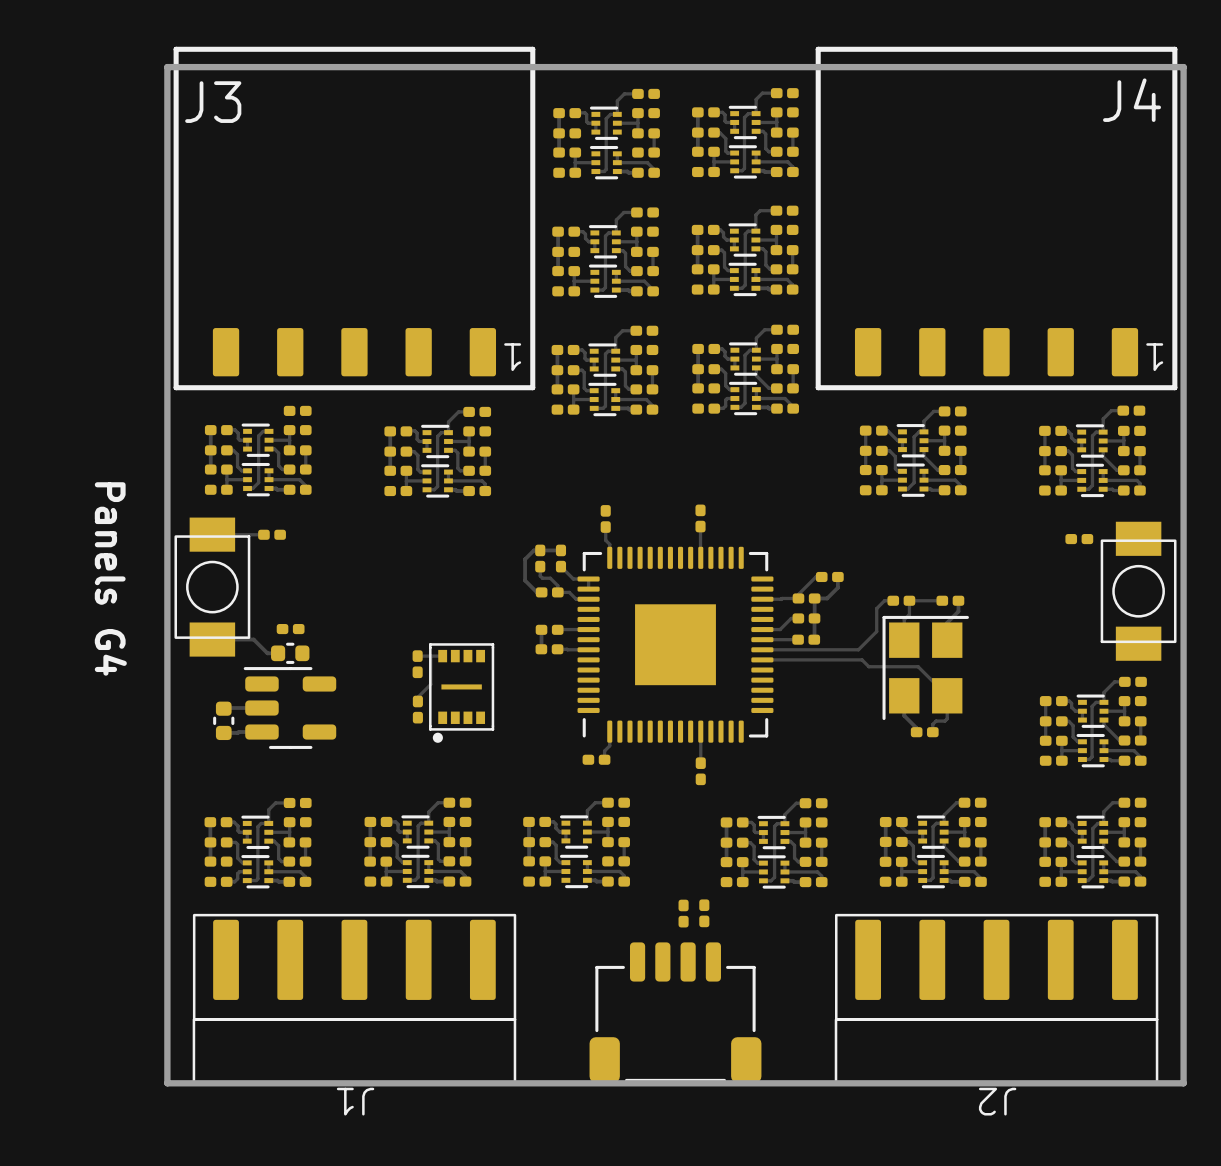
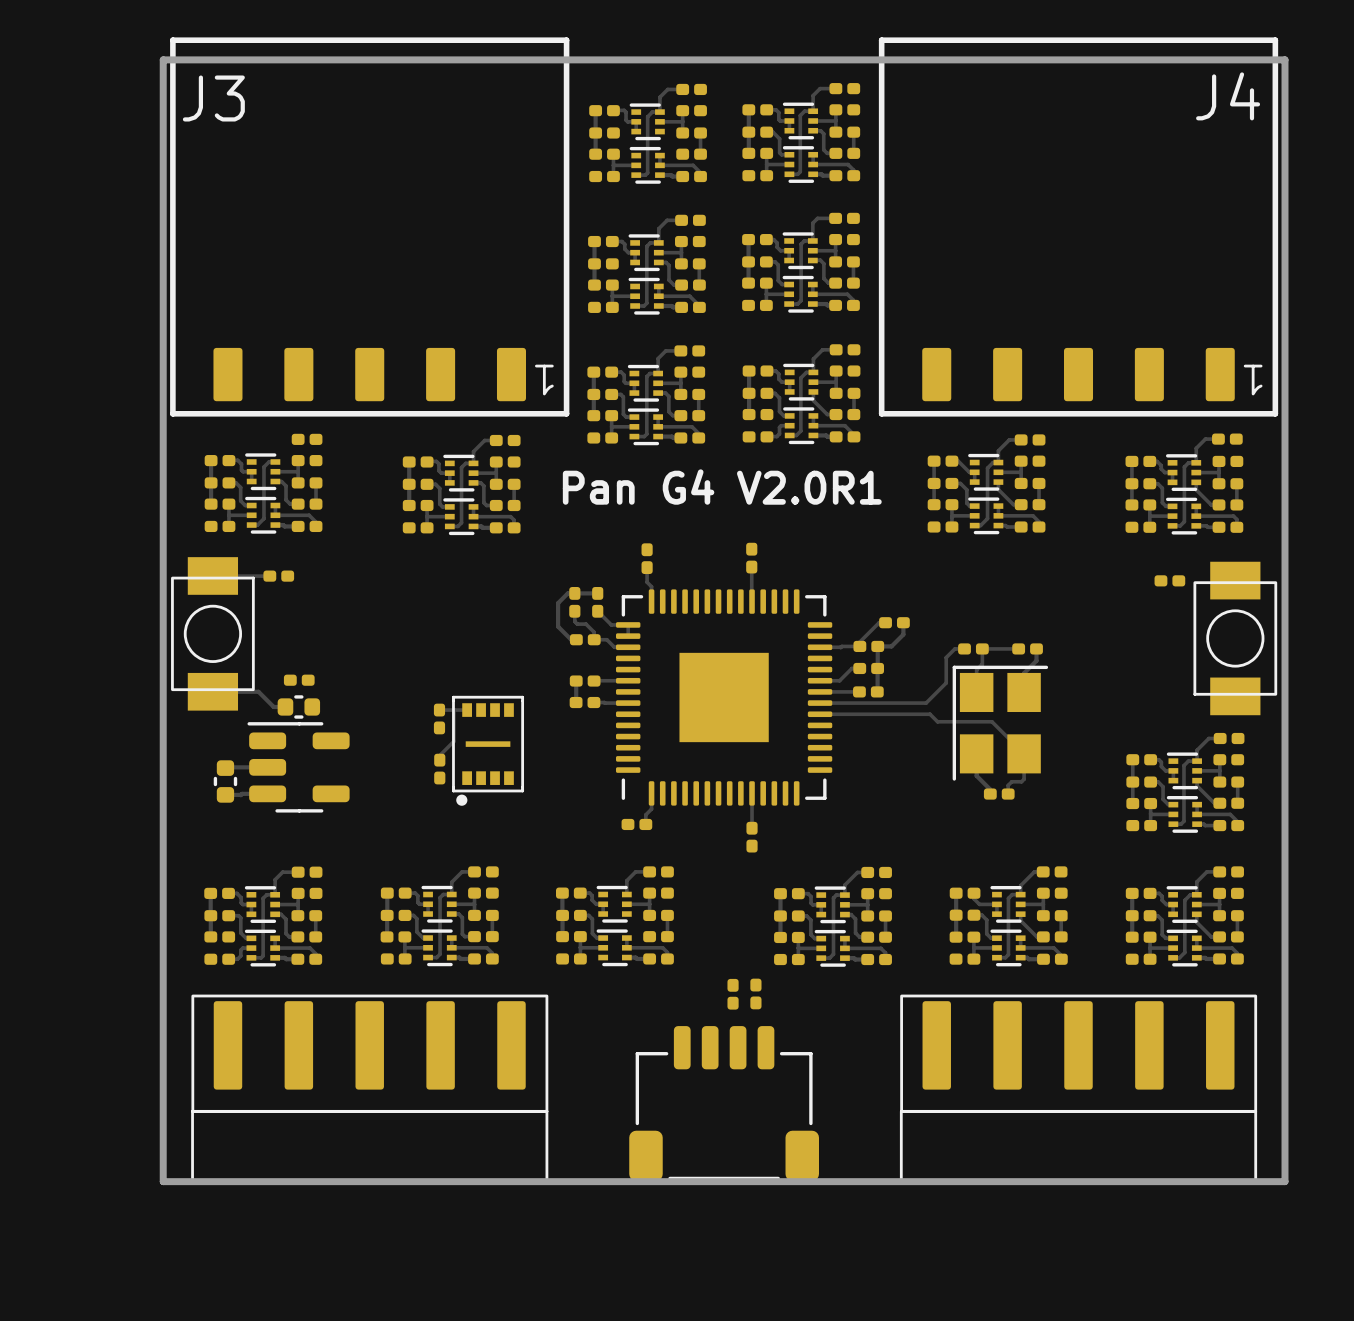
text: none -> Pan G4 V2.0R1 (722, 487)
text: Panels G4 (110, 578) -> none
J1 name: J1 (355, 1101) -> none
J2 name: J2 (997, 1101) -> none

